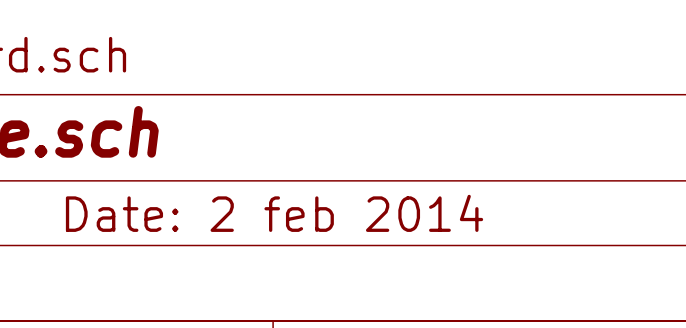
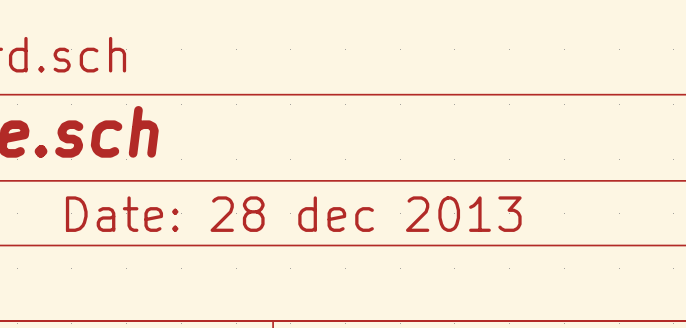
title block: Date: 2 feb 2014 (274, 213) -> Date: 28 dec 2013 (293, 214)

